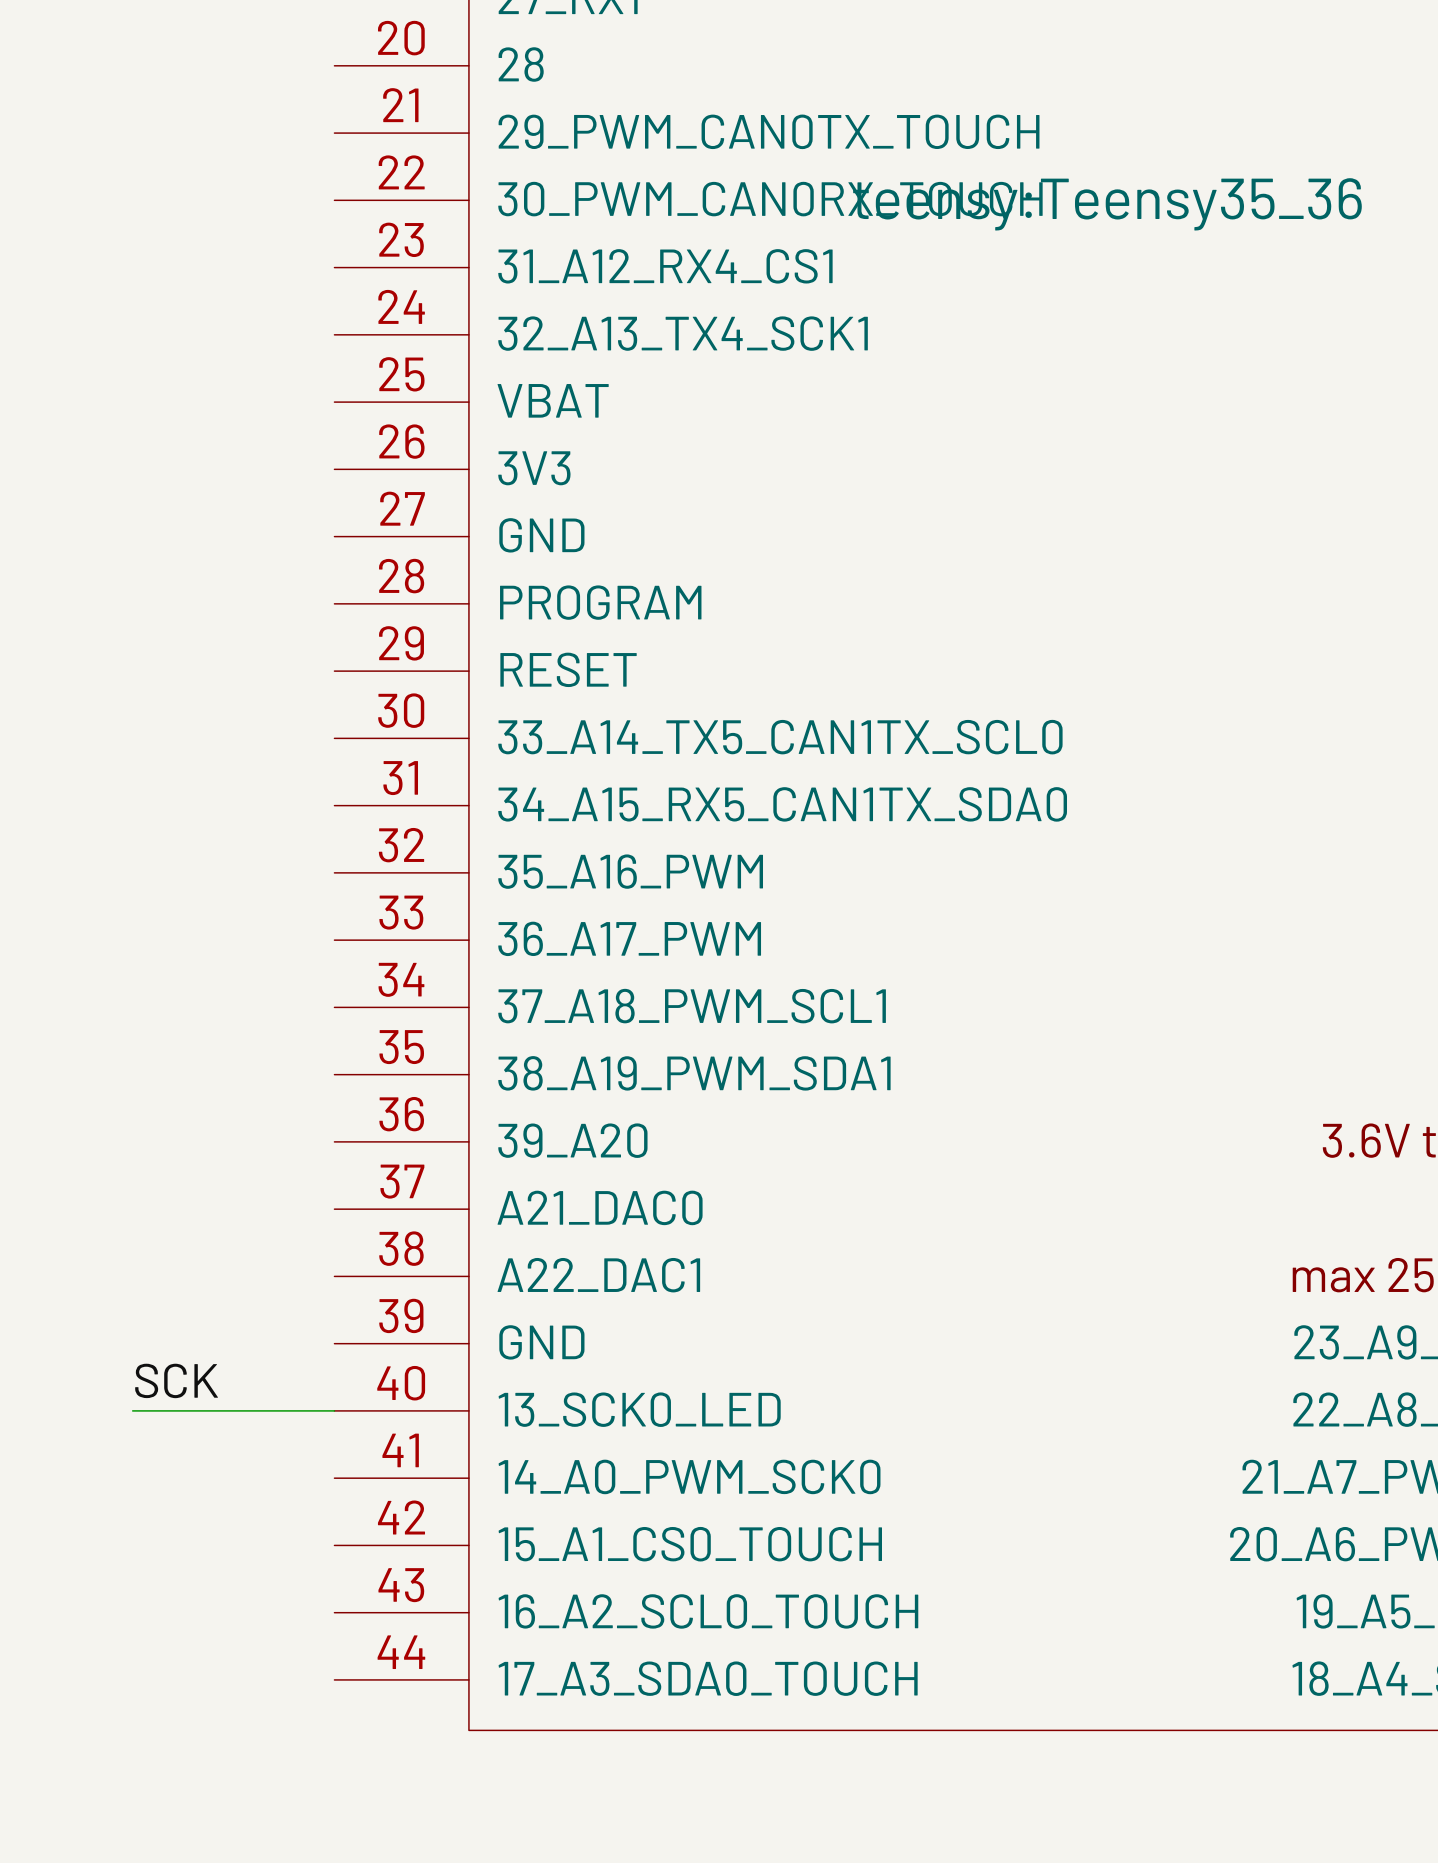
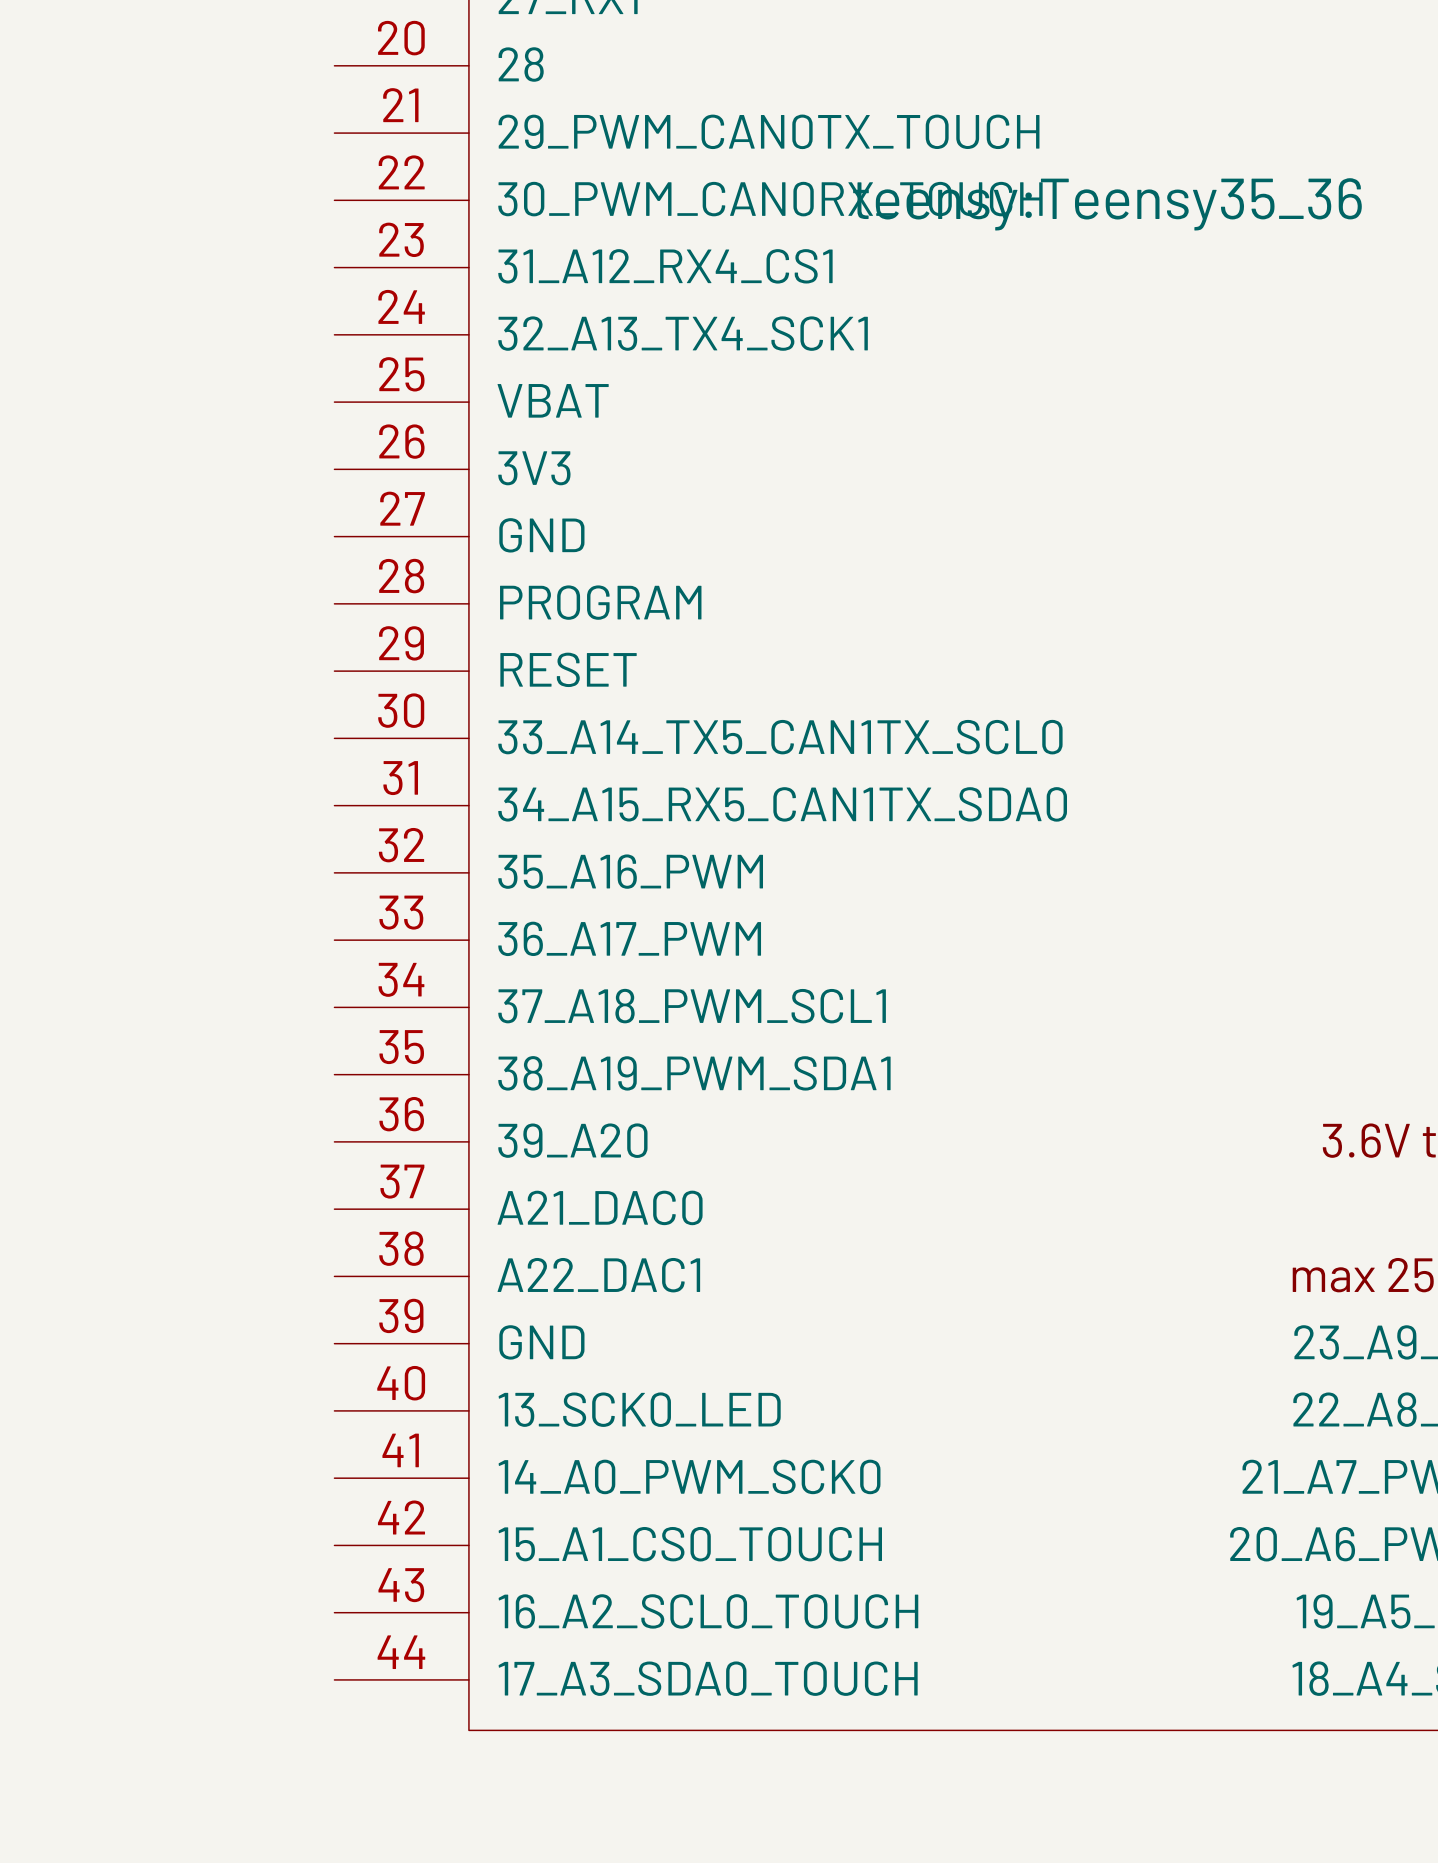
label: SCK (176, 1380) -> none
wire: (132, 1410) (334, 1410) -> none

